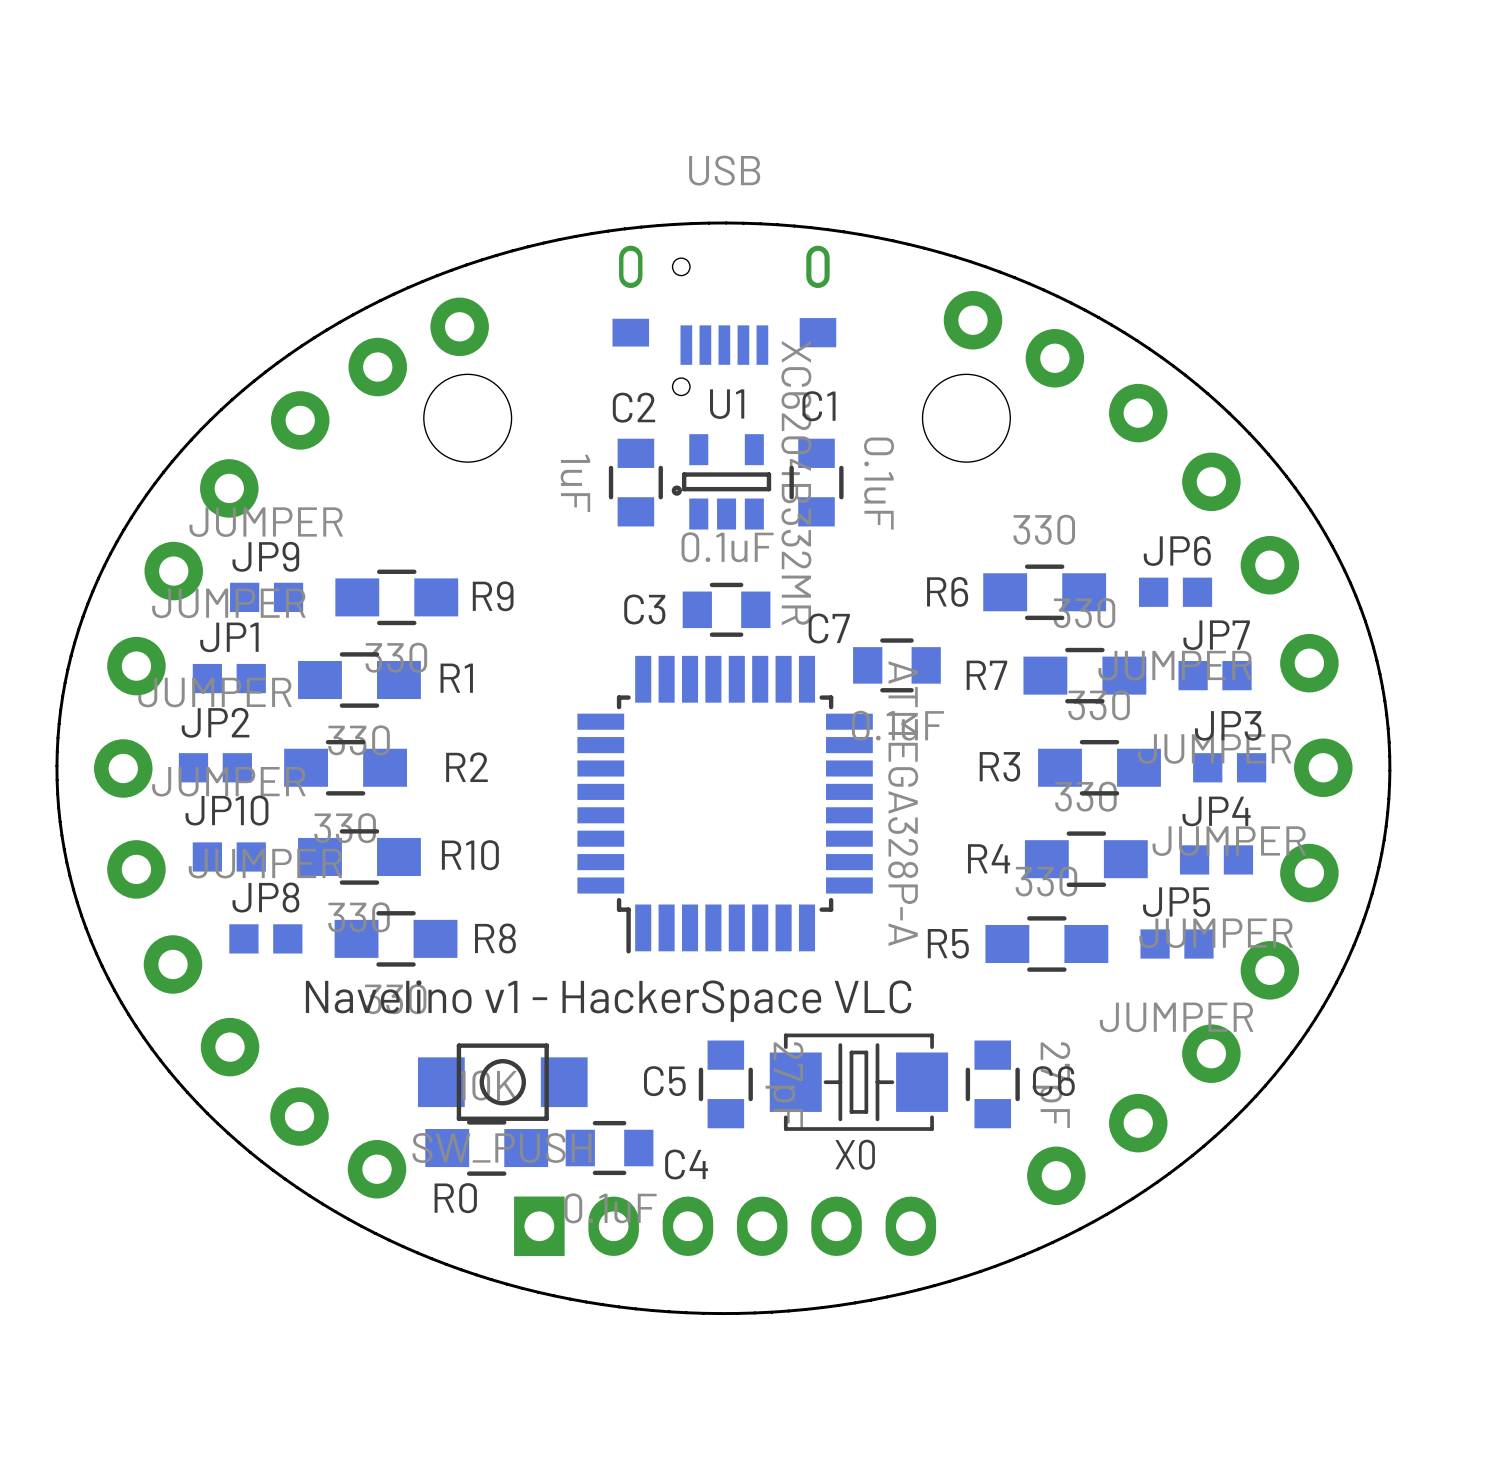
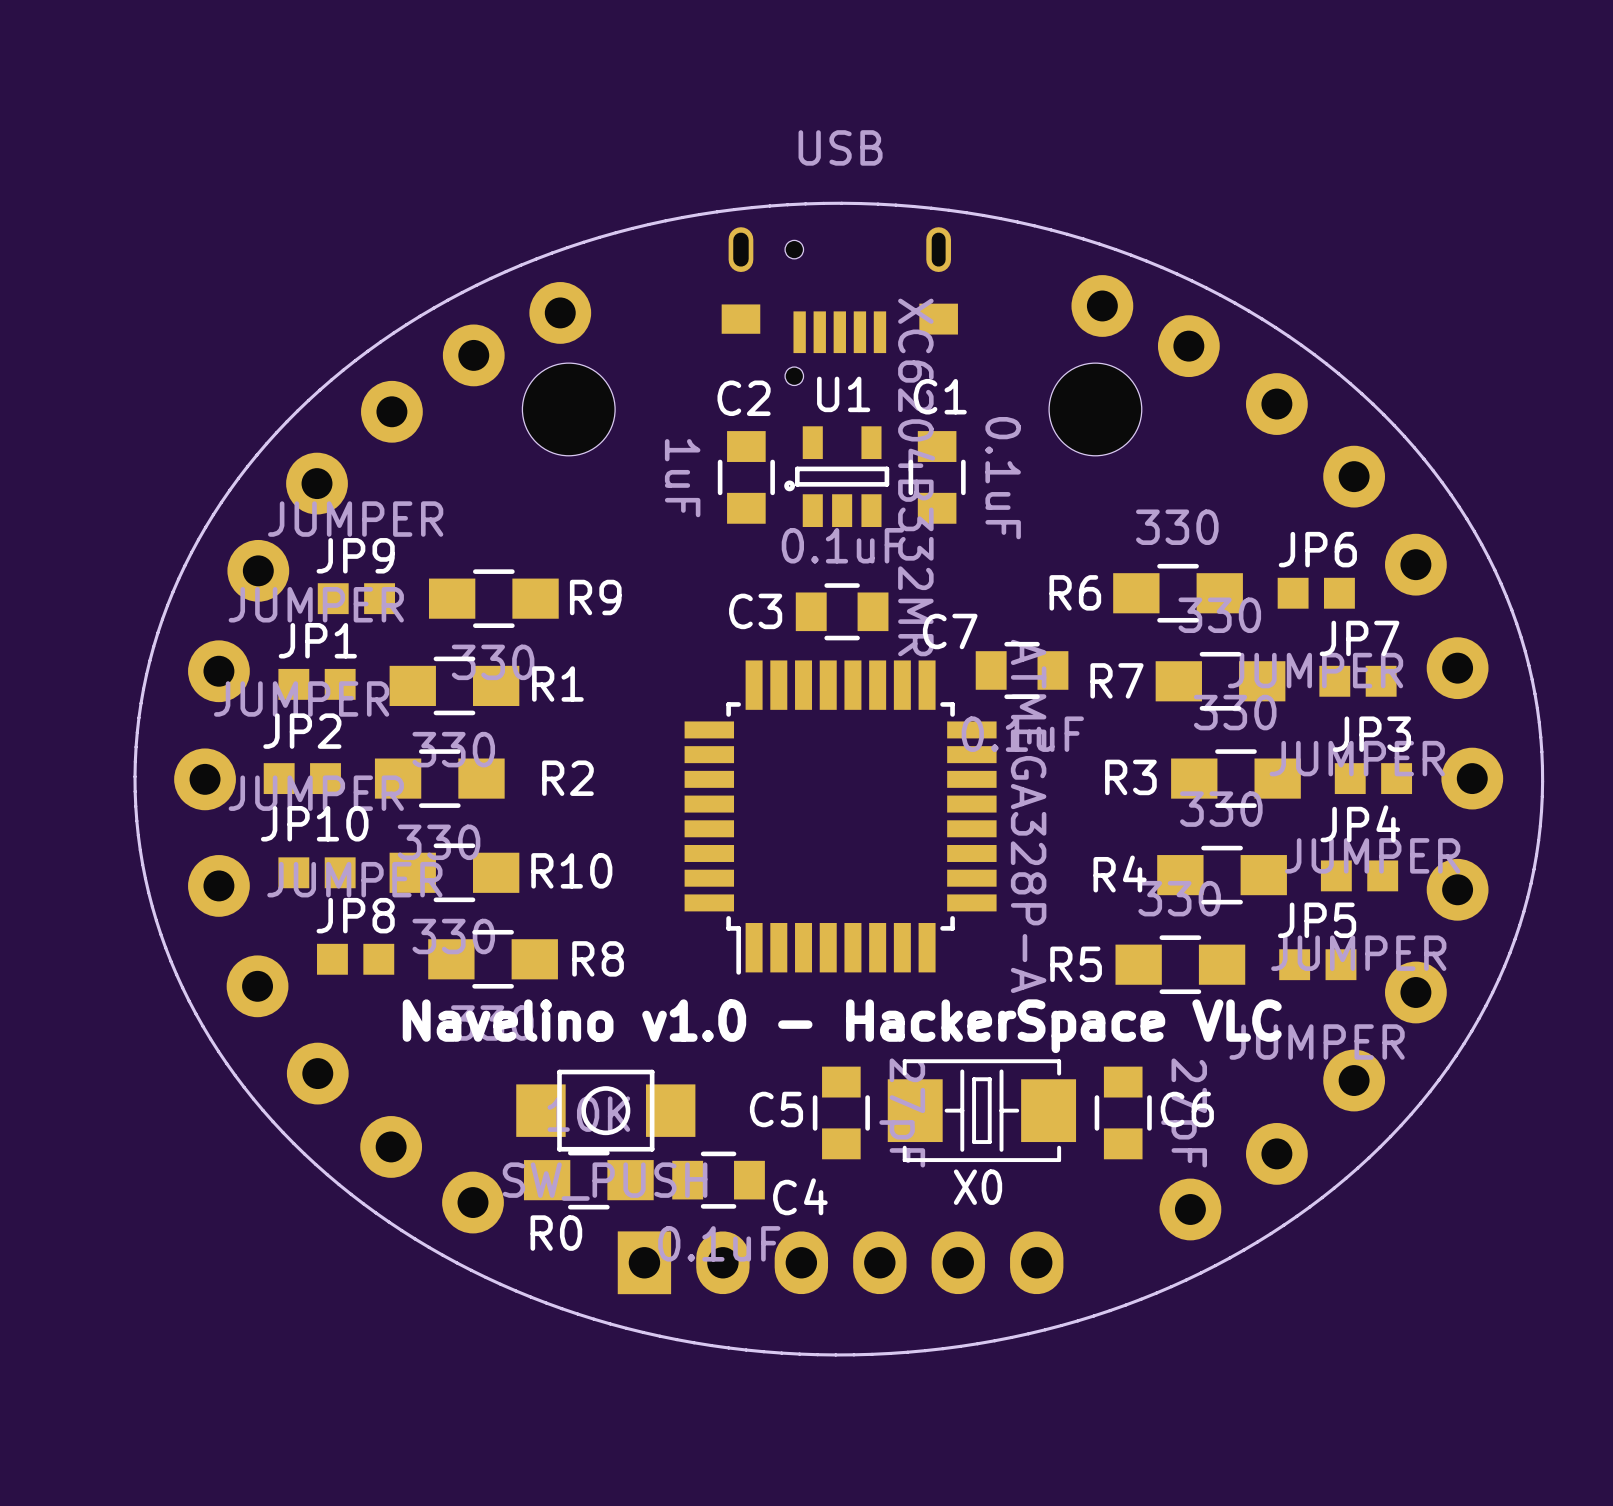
text: Navelino v1 - HackerSpace VLC (608, 1001) -> Navelino v1.0 - HackerSpace VLC (842, 1026)

